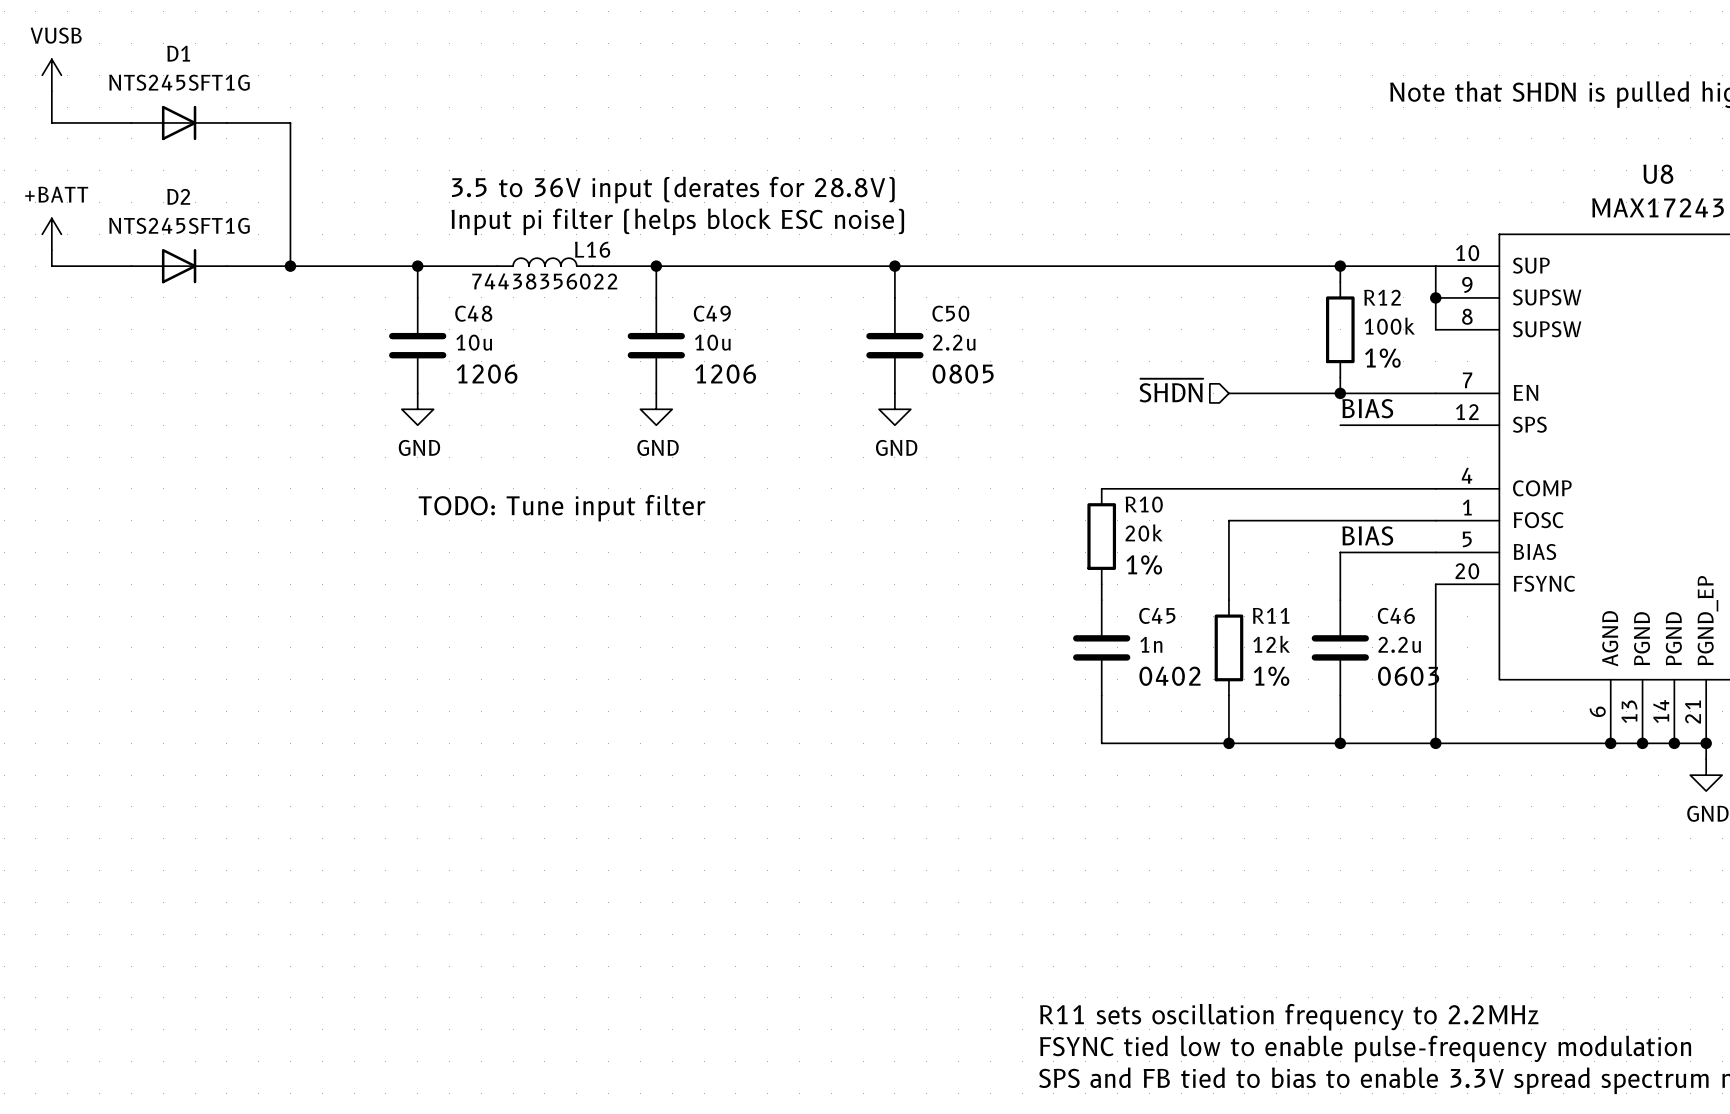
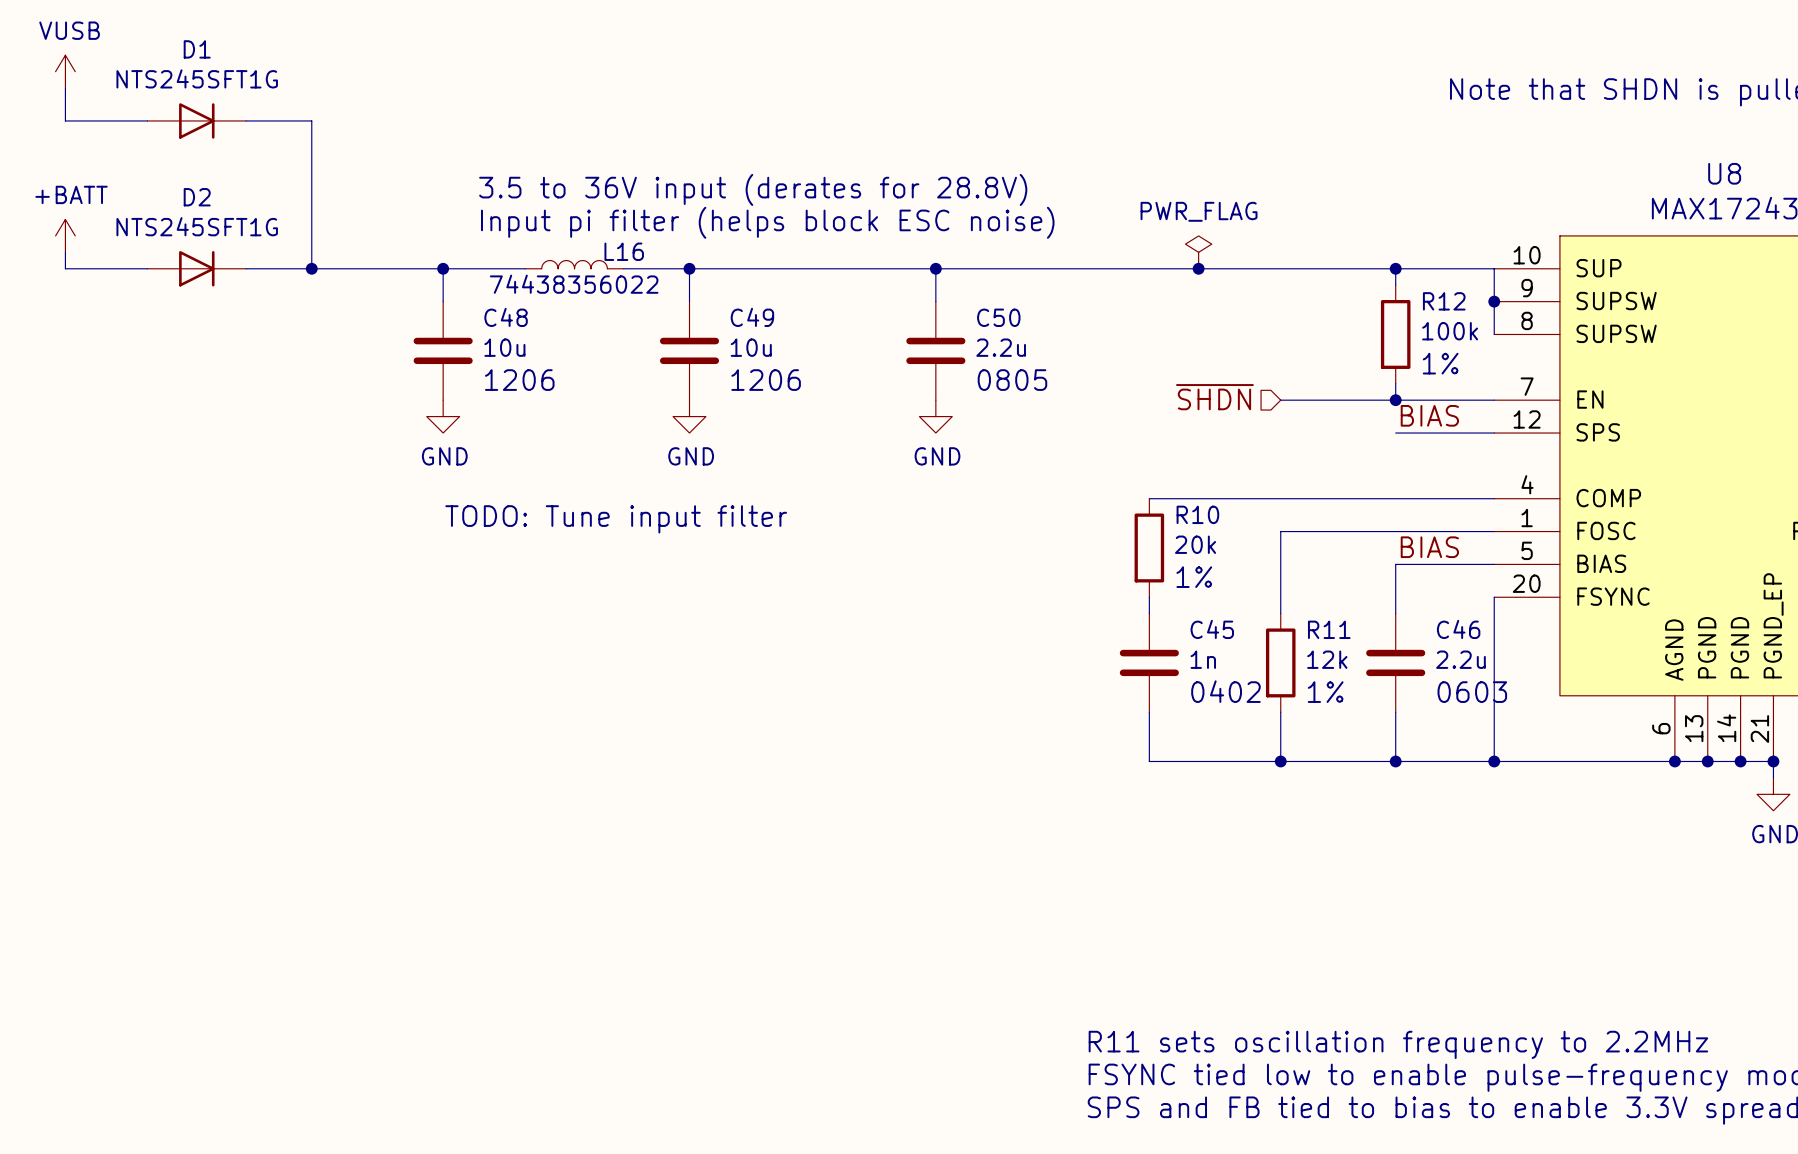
power symbol: none -> PWR_FLAG (1198, 252)
junction: none -> (1198, 268)

